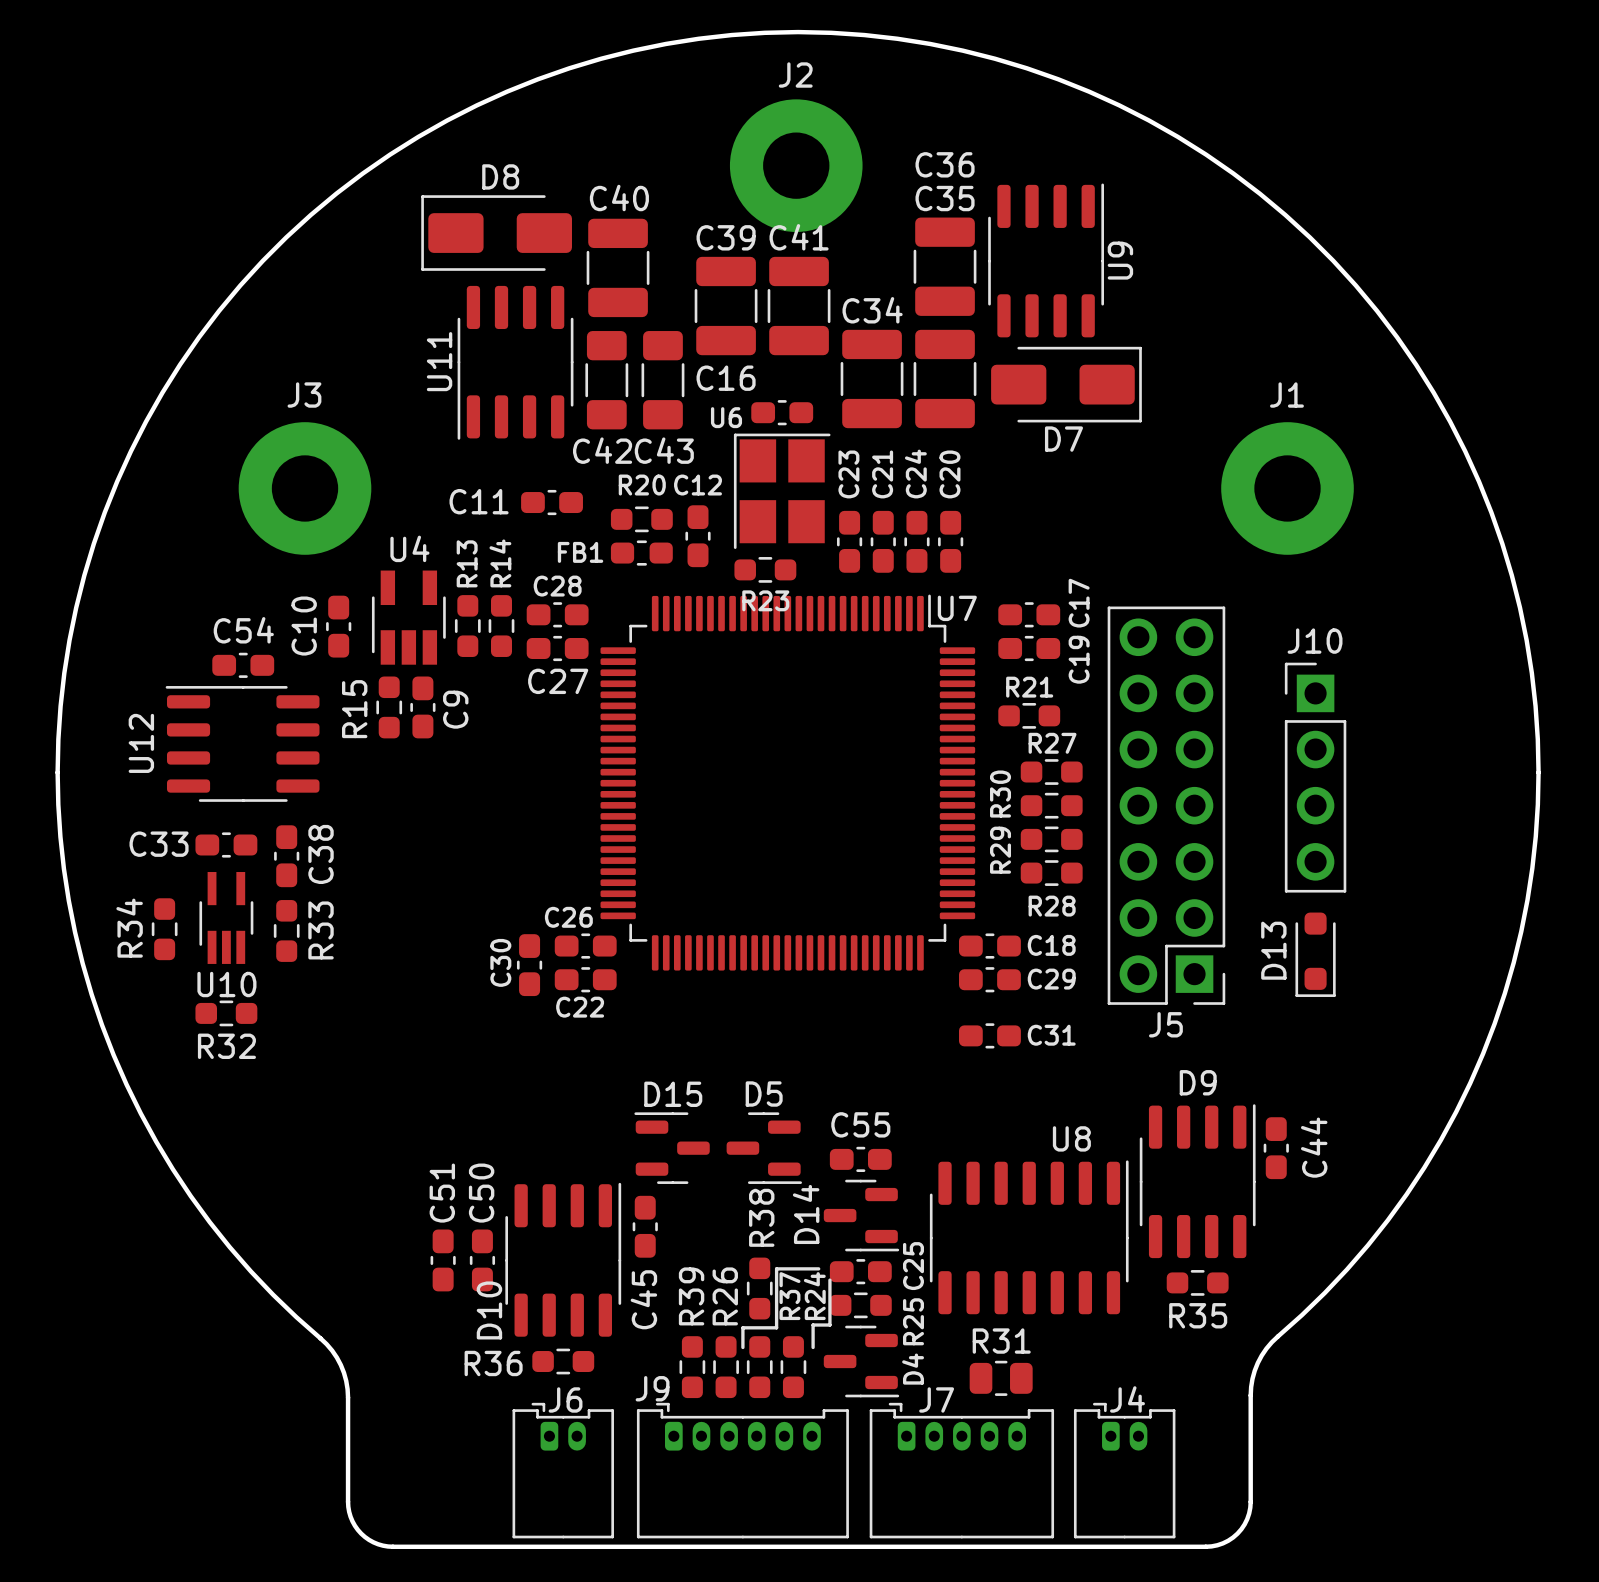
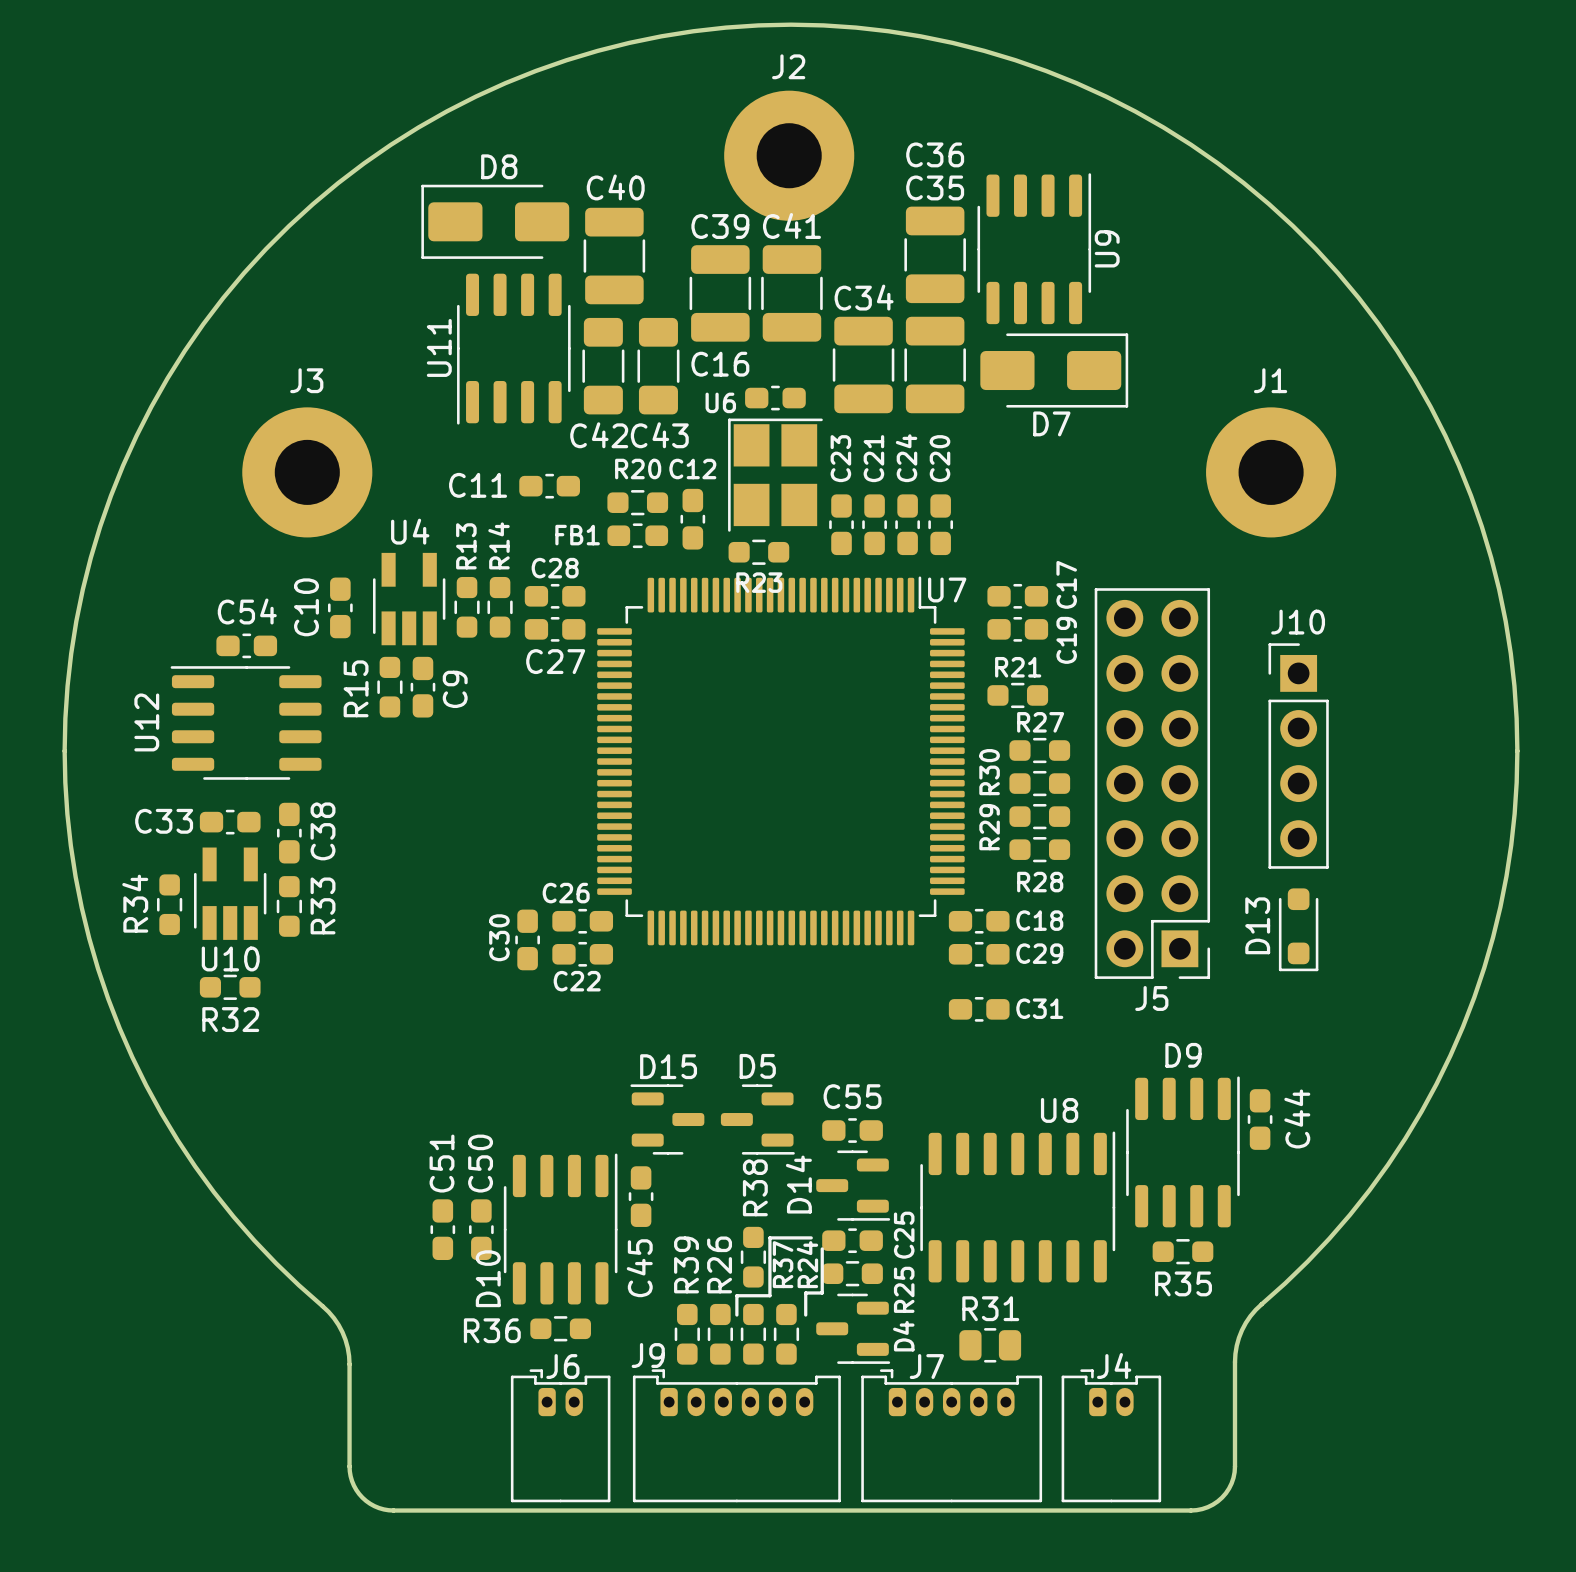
U10 footprint: [199, 872, 254, 964] -> [194, 847, 267, 940]

